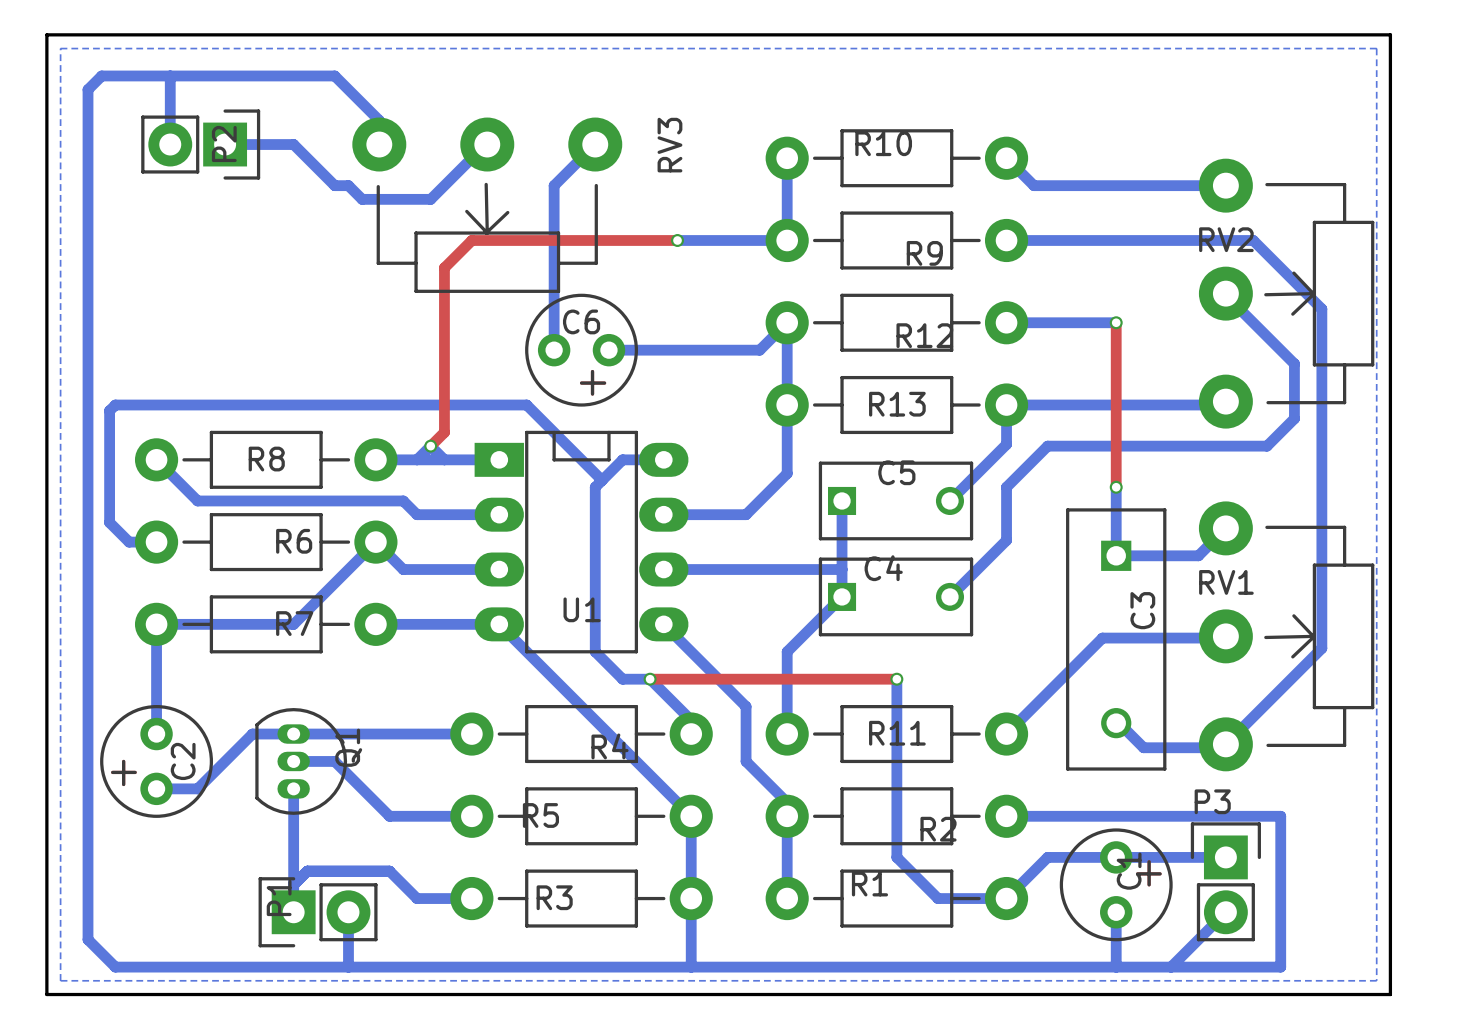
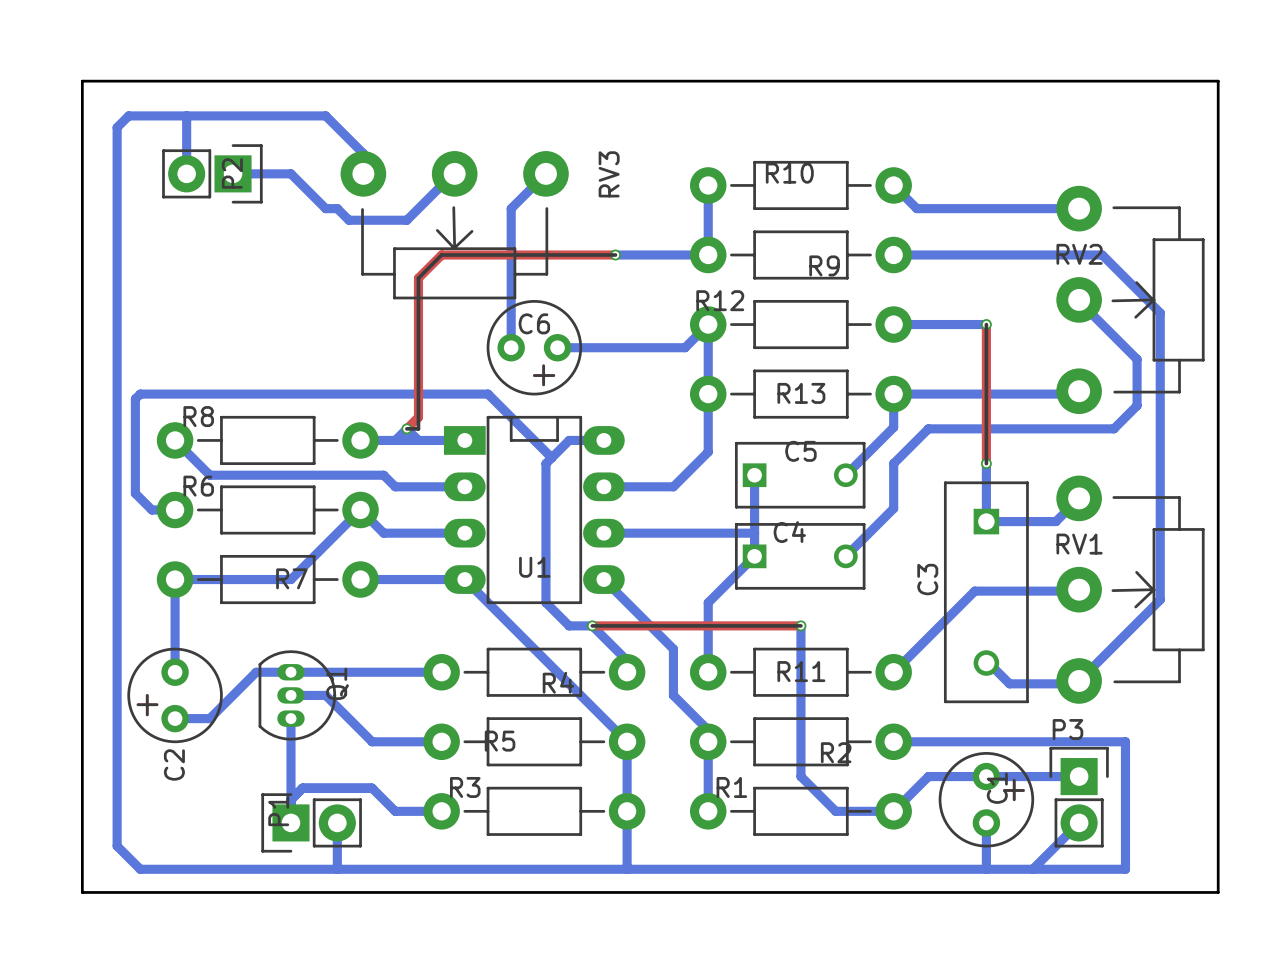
bottom zone outline: (60, 48) (60, 980) (1376, 980) (1376, 48) (60, 48) -> none
line: none -> (615, 255) (441, 255) (418, 278) (418, 428) (406, 428)
line: none -> (986, 324) (986, 463)
R12 name position: R12 (924, 335) -> R12 (720, 300)
R8 name position: R8 (266, 459) -> R8 (198, 416)
R6 name position: R6 (294, 541) -> R6 (198, 486)
C3 name position: C3 (1142, 610) -> C3 (927, 579)
line: none -> (592, 625) (800, 625)
C2 name position: C2 (183, 761) -> C2 (174, 764)
R1 name position: R1 (869, 884) -> R1 (731, 787)
R3 name position: R3 (554, 897) -> R3 (465, 787)

